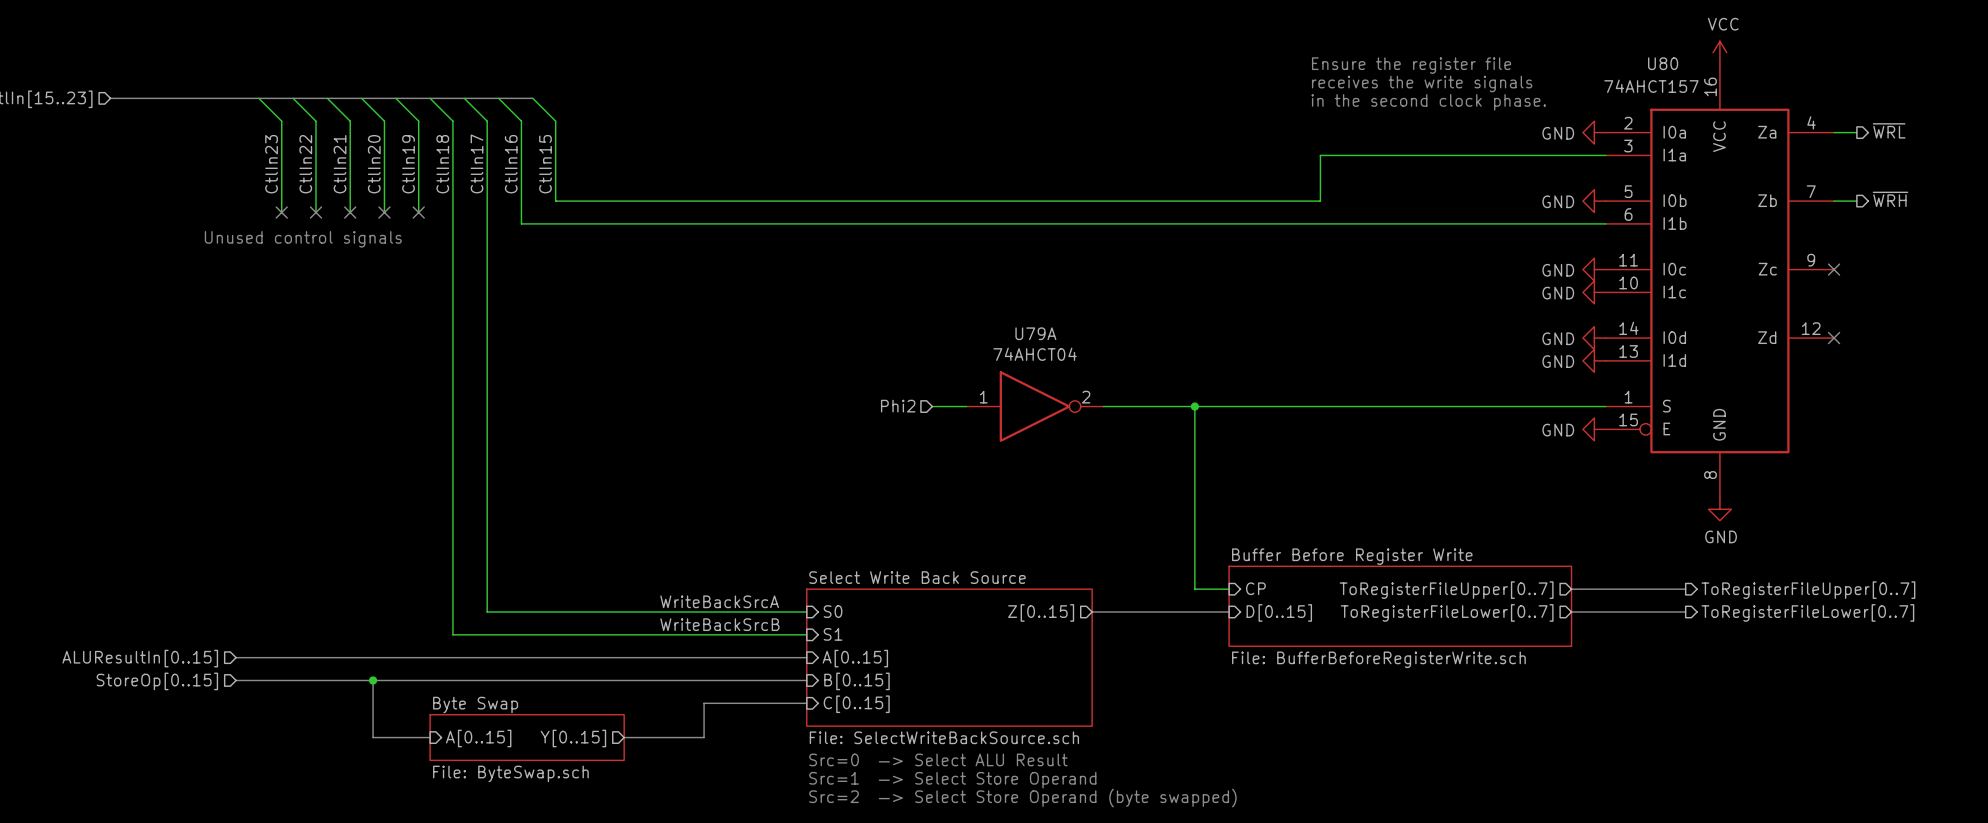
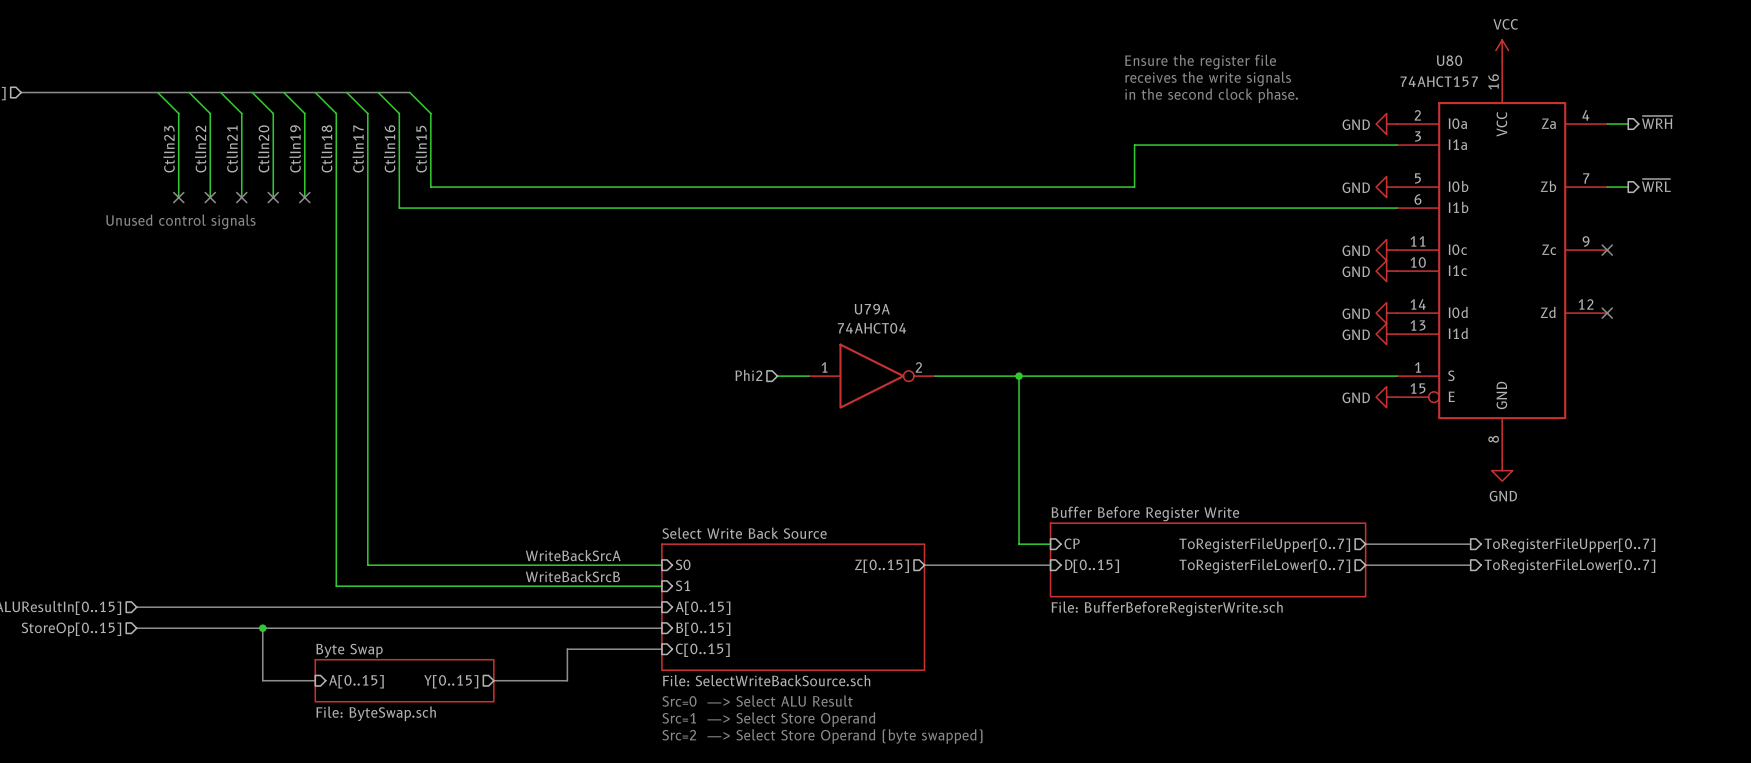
hierarchical label: ~{WRL} (1889, 130) -> ~{WRH} (1657, 122)
hierarchical label: ~{WRH} (1890, 199) -> ~{WRL} (1656, 185)

